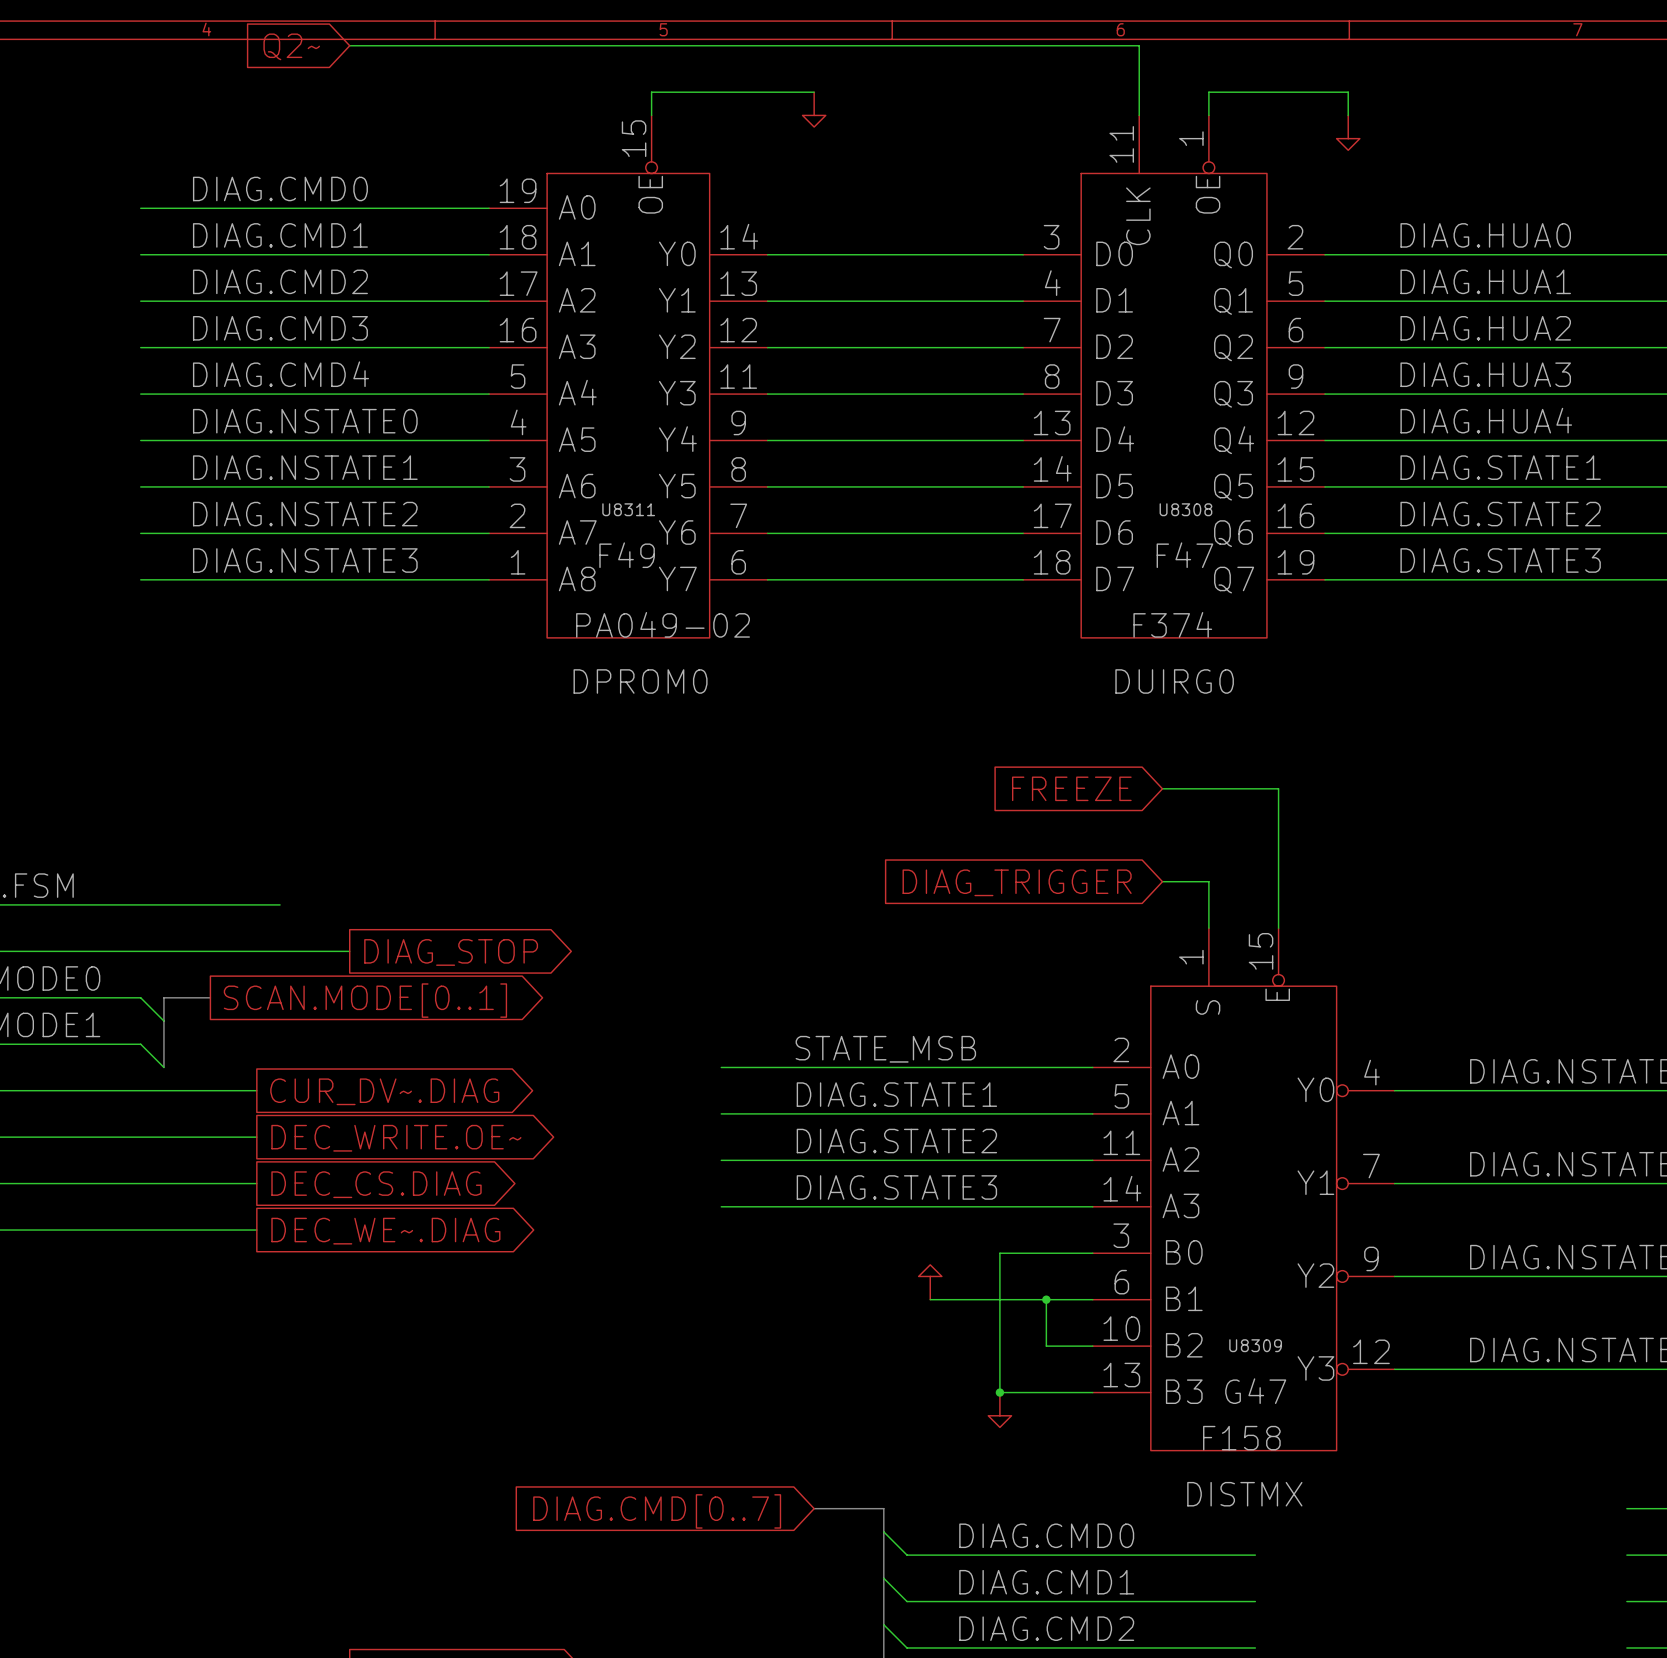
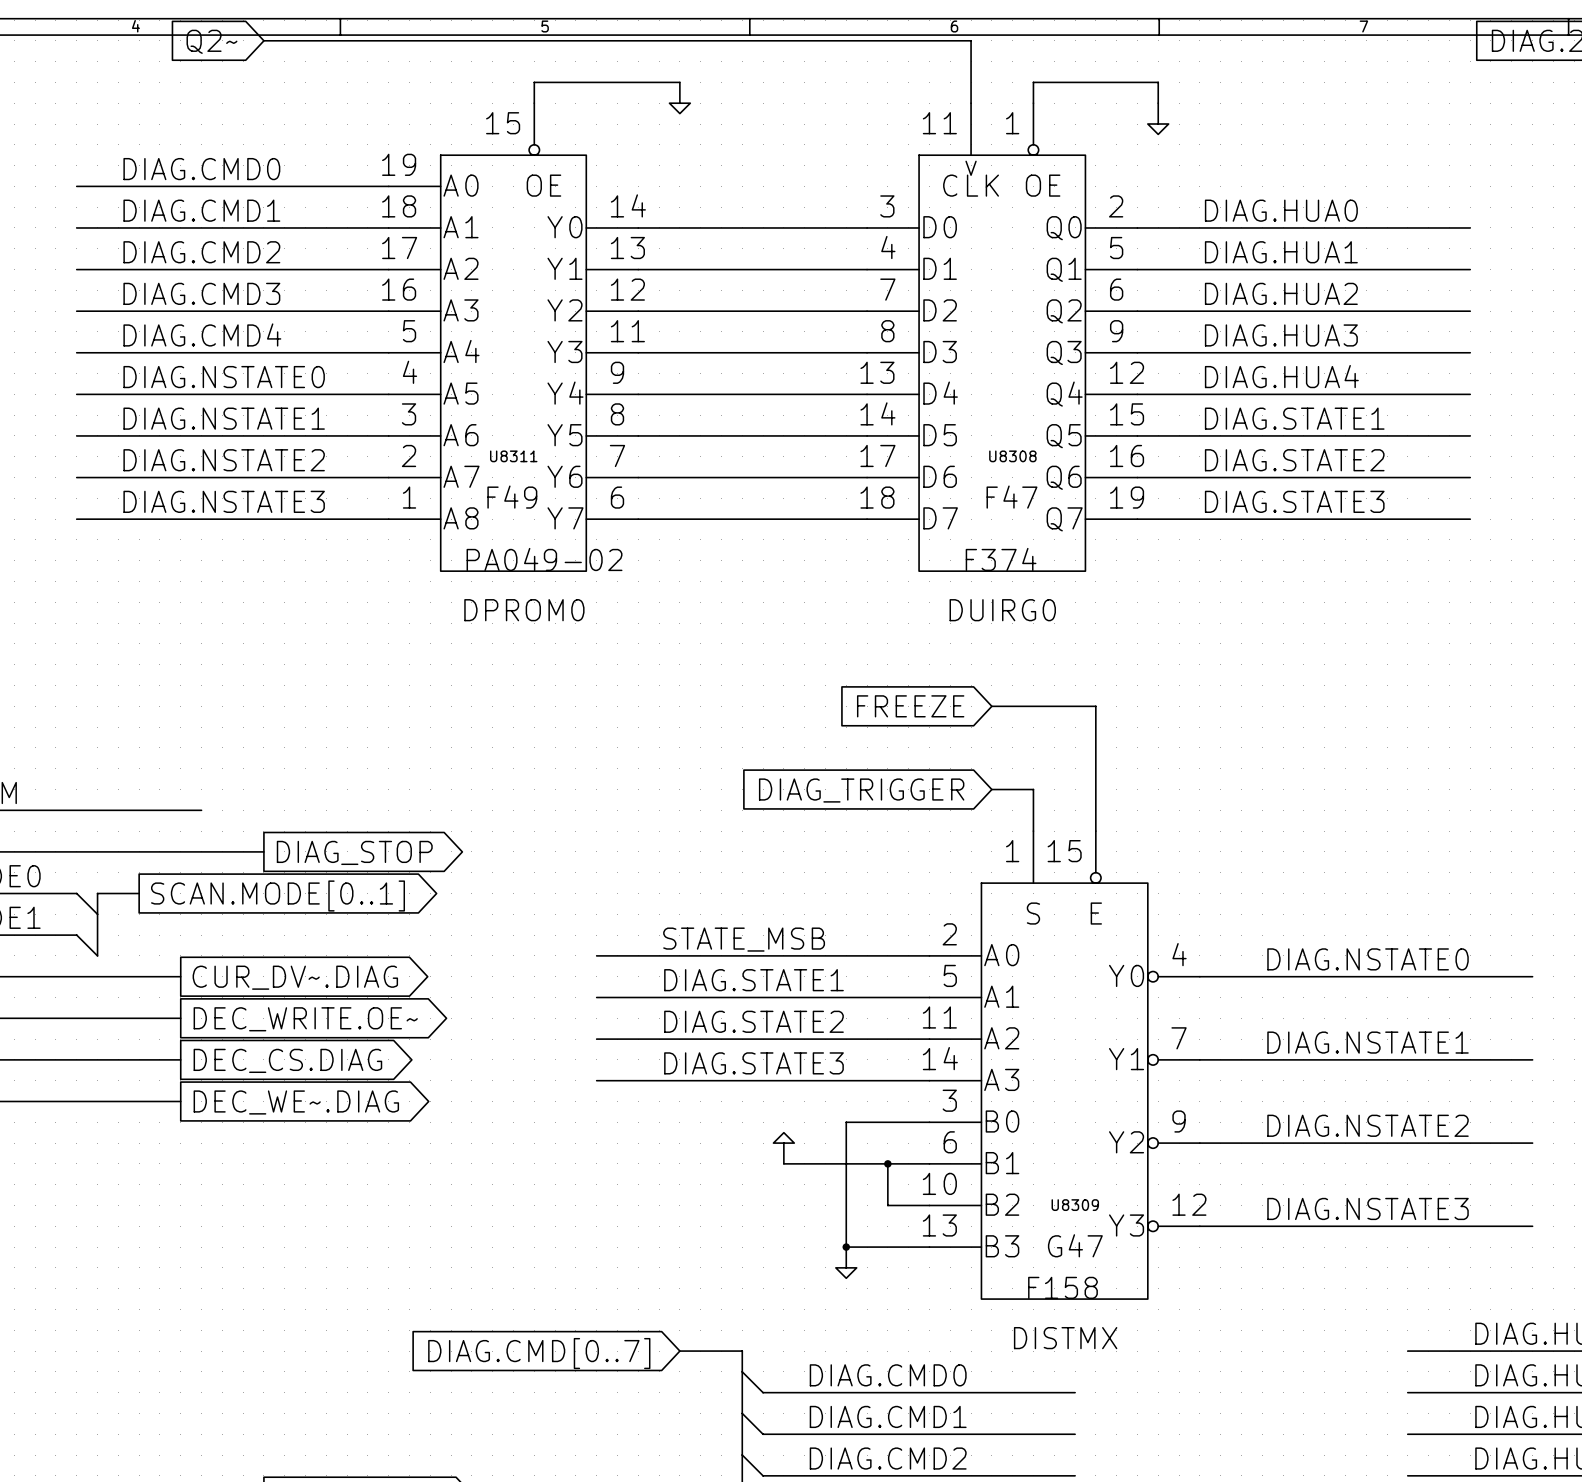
U8311 symbol: [489, 115, 768, 638] -> [388, 103, 639, 572]
U8308 symbol: [1023, 115, 1326, 638] -> [867, 103, 1138, 572]
U8309 symbol: [1092, 928, 1395, 1451] -> [929, 831, 1200, 1300]

